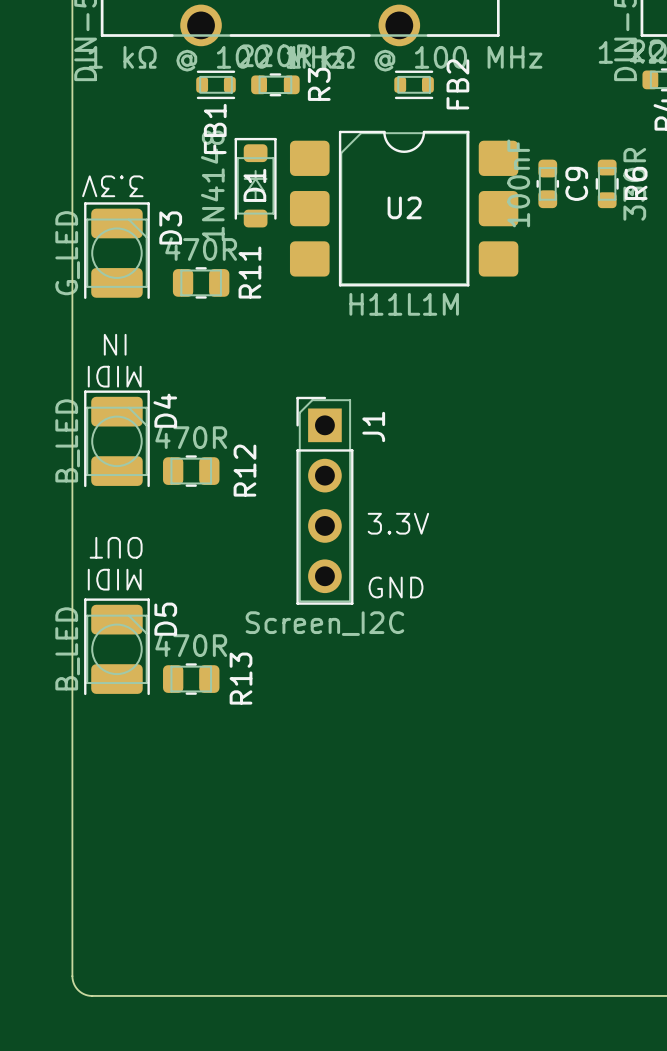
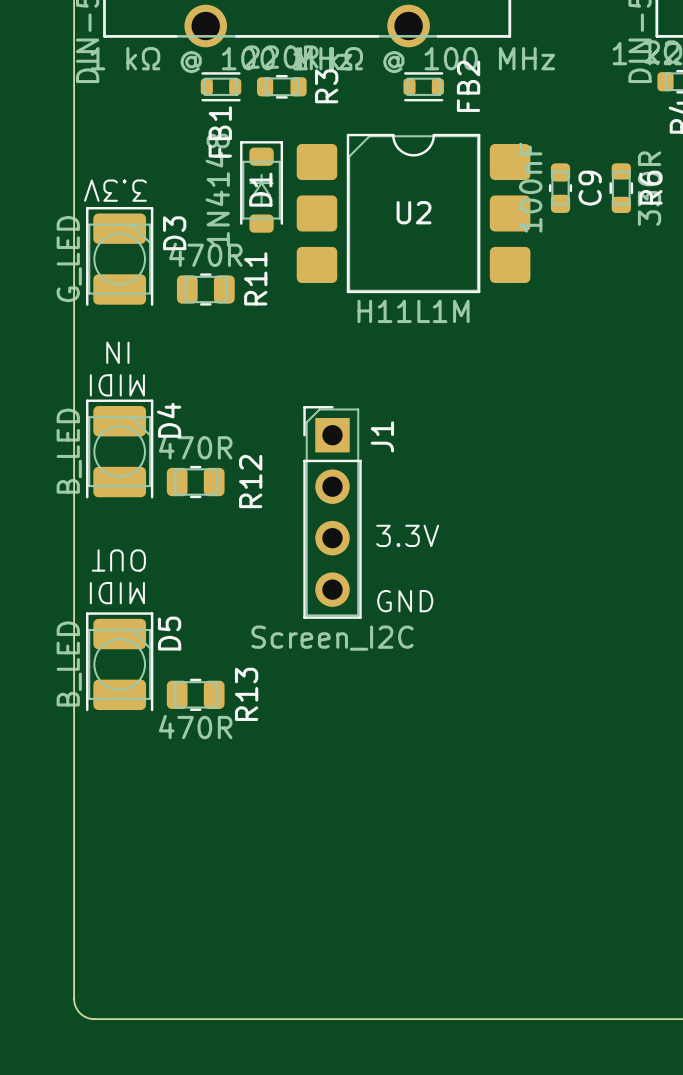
R13 value position: 470R (191, 645) -> 470R (195, 727)

